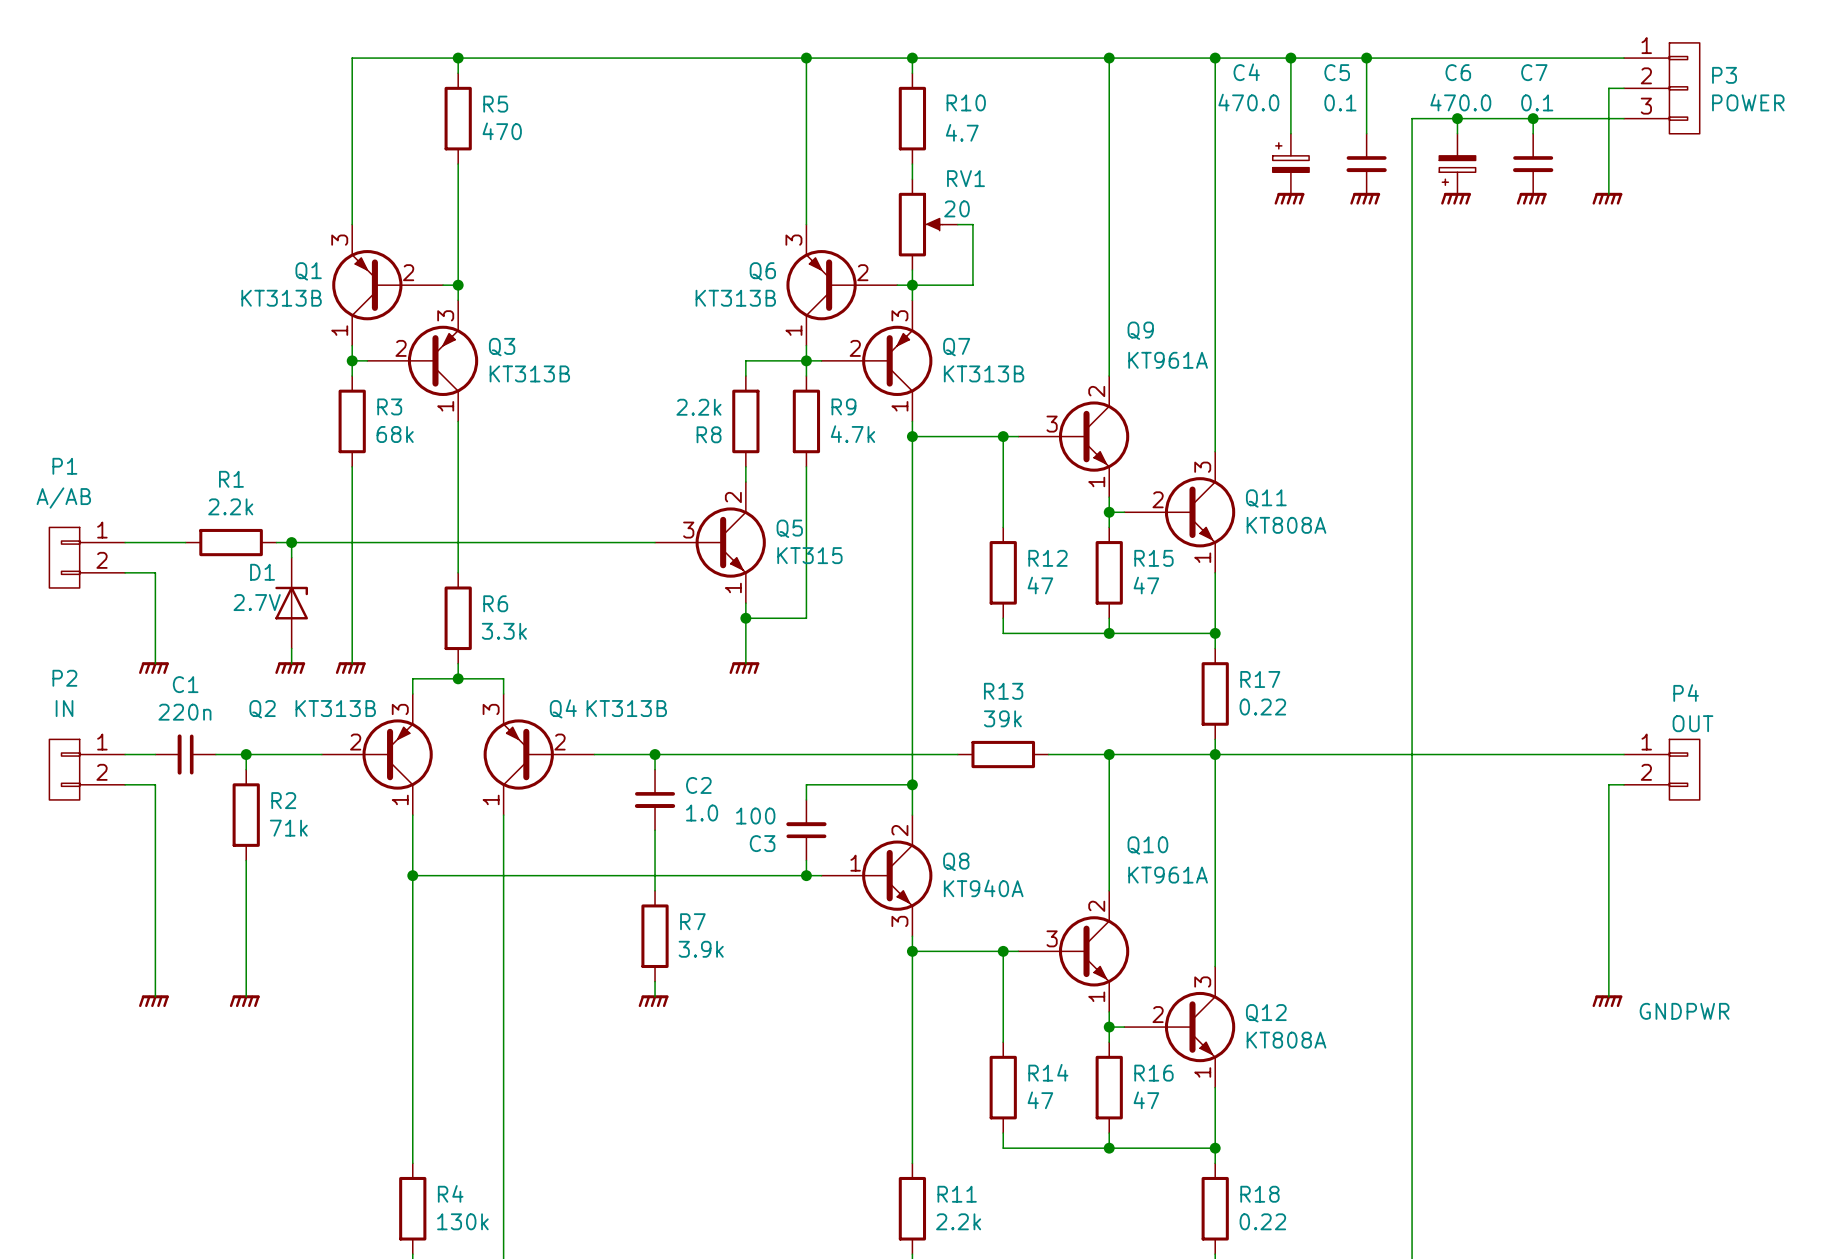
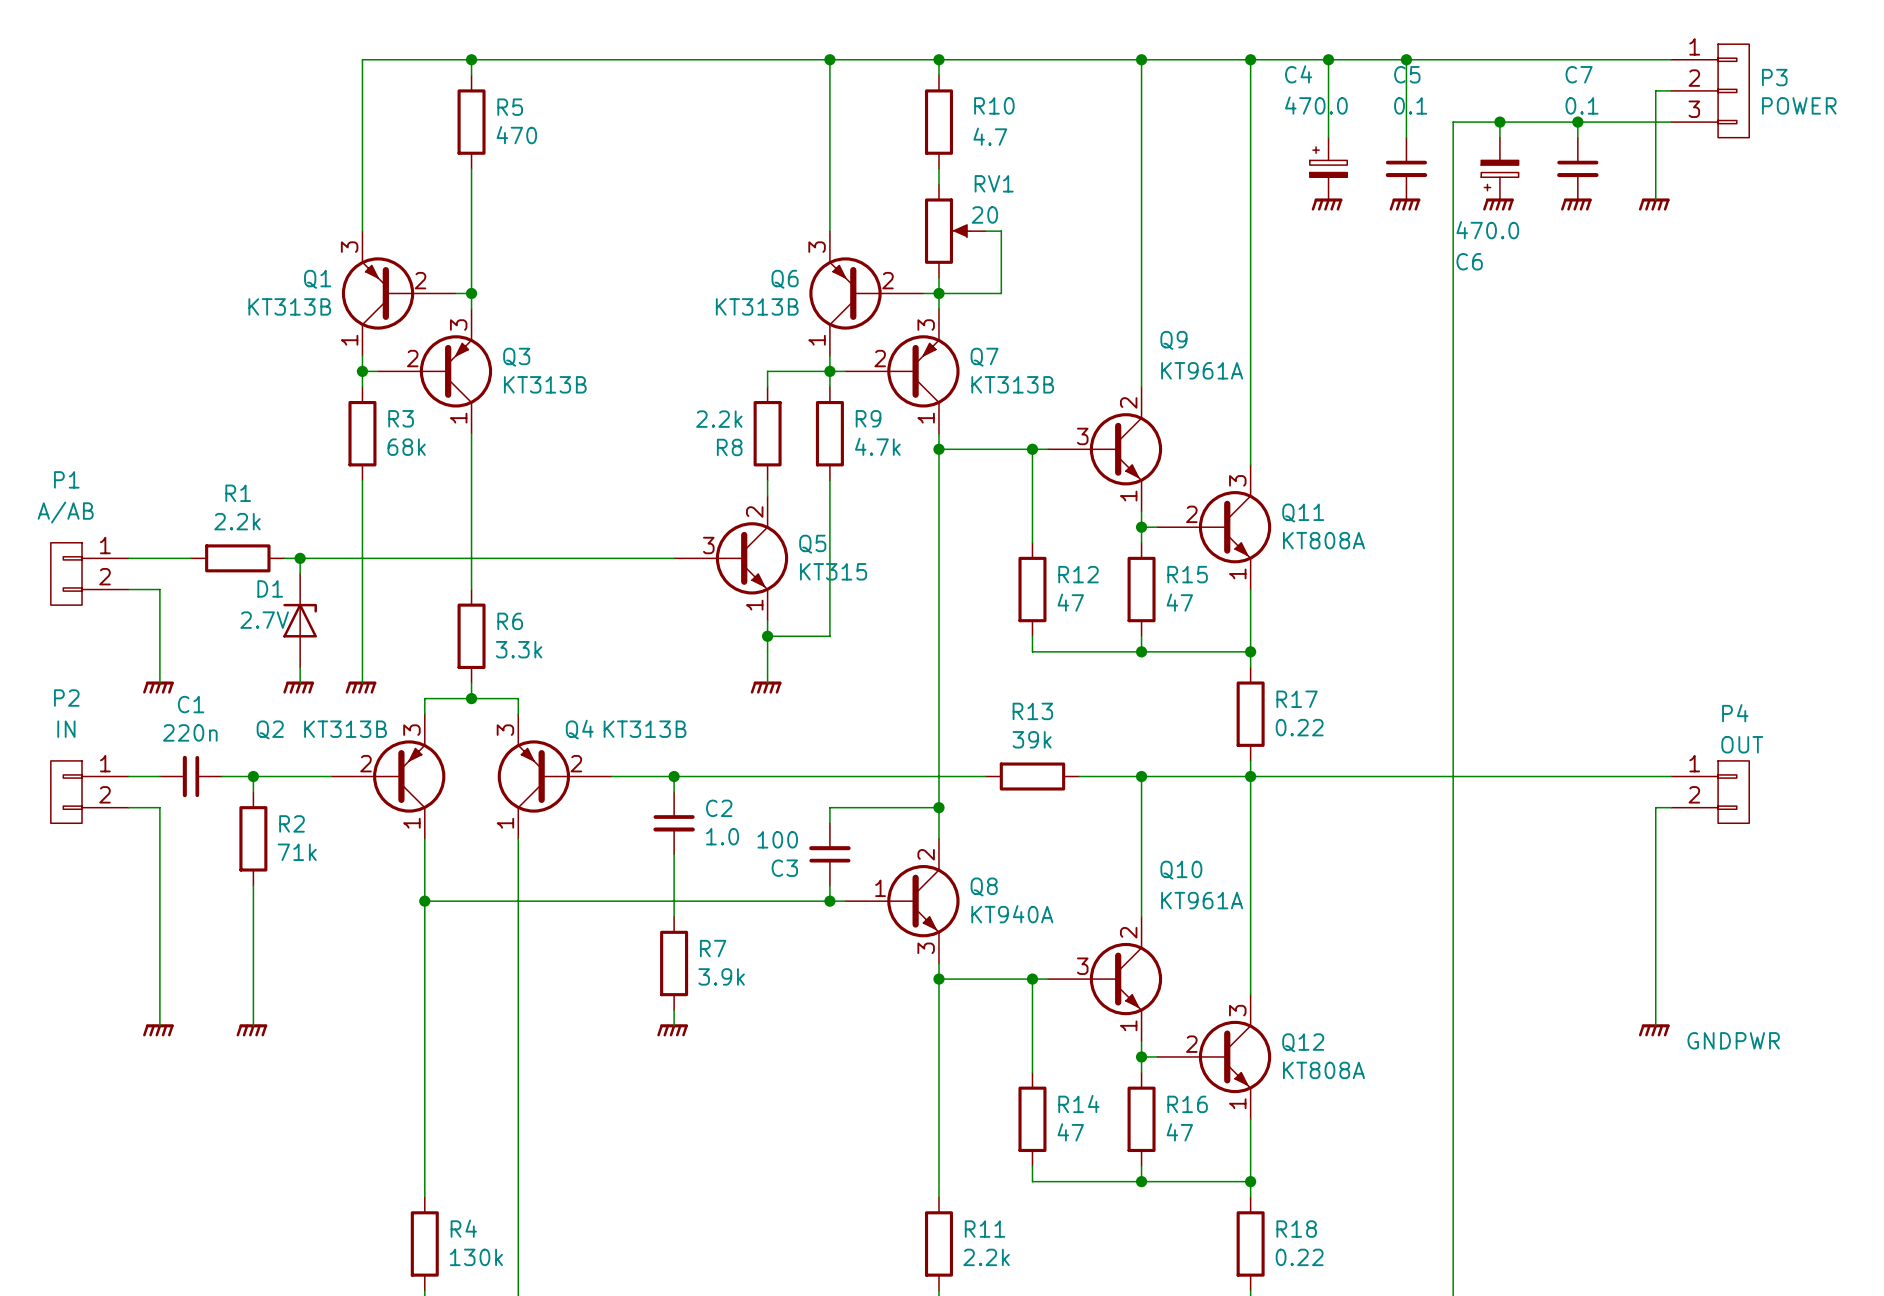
C4 name position: C4 (1246, 72) -> C4 (1298, 74)
C5 name position: C5 (1337, 72) -> C5 (1407, 74)
C6 name position: C6 (1458, 72) -> C6 (1469, 261)
C4 value position: 470.0 (1248, 102) -> 470.0 (1316, 105)
C5 value position: 0.1 (1340, 102) -> 0.1 (1410, 105)
C6 value position: 470.0 (1460, 102) -> 470.0 (1487, 230)

